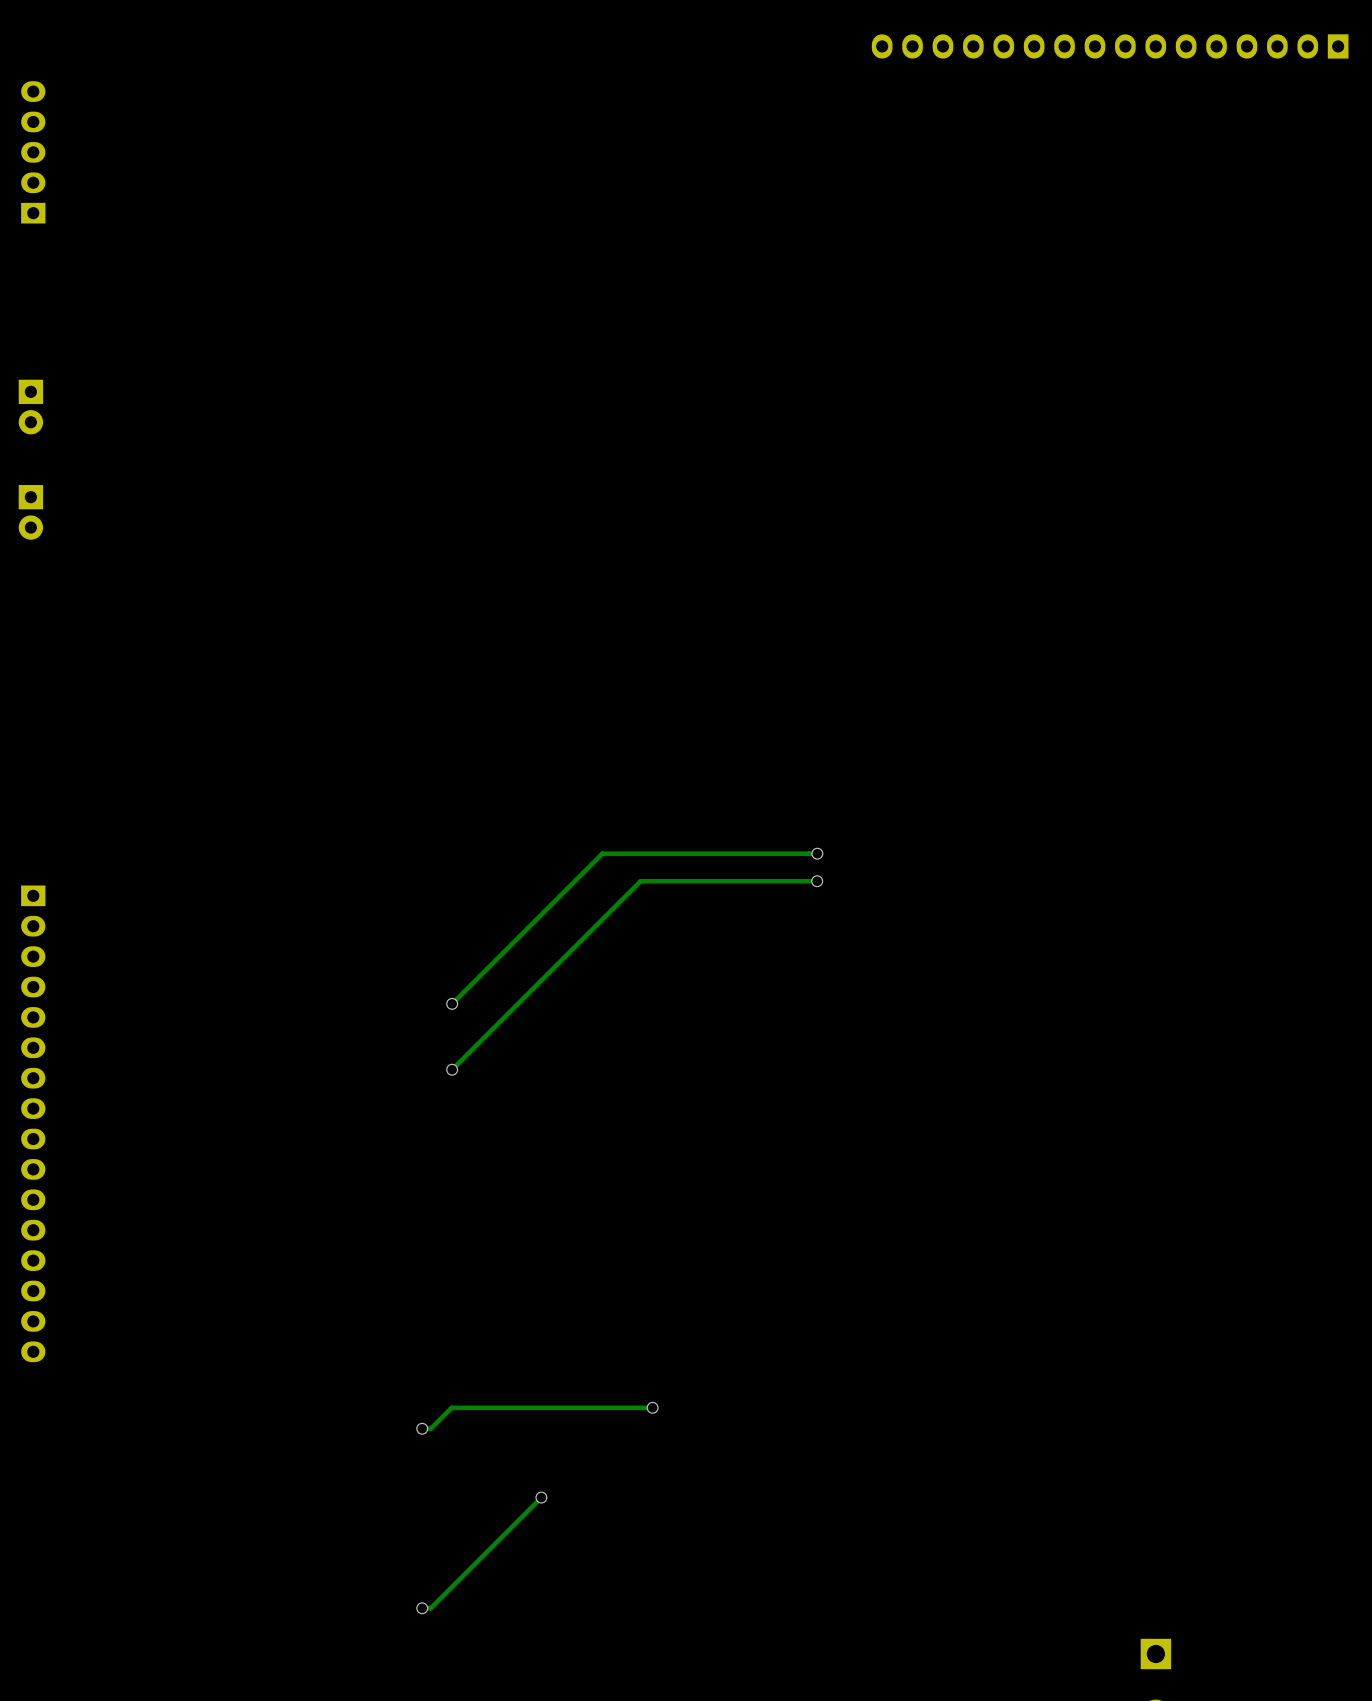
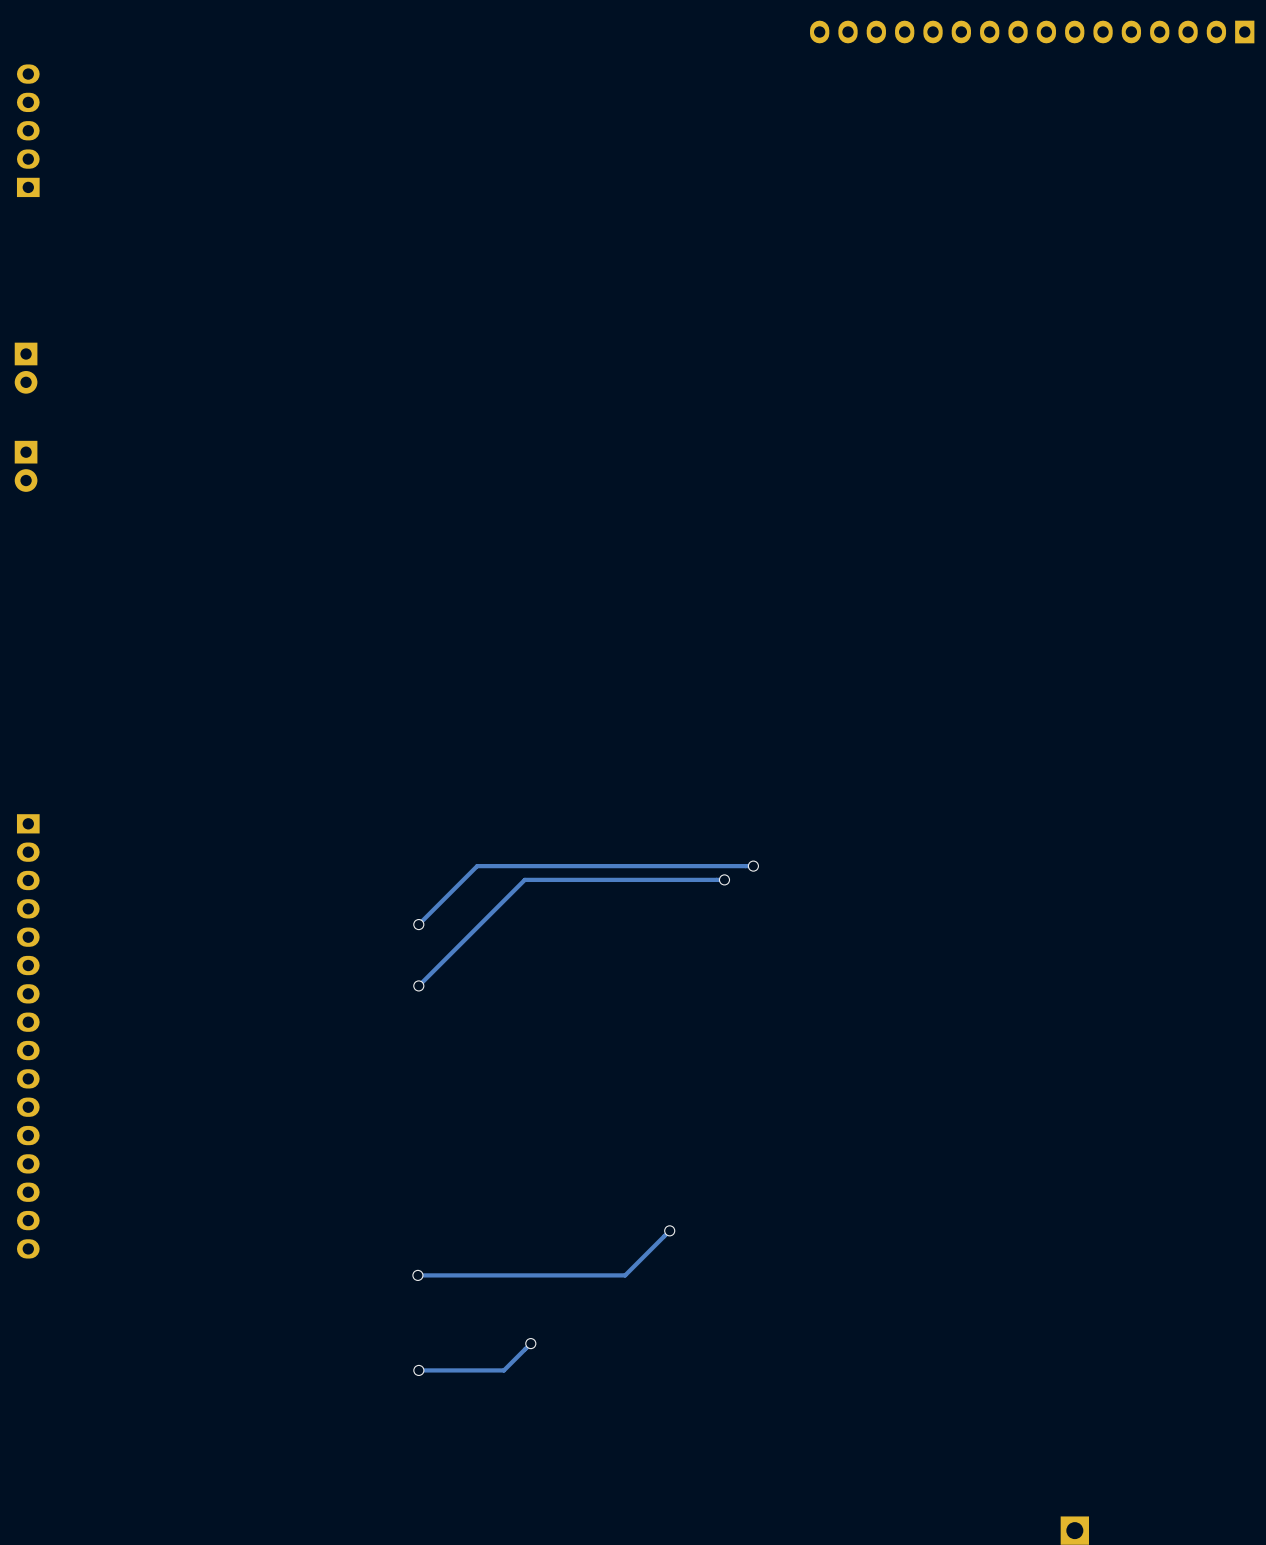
track: (817, 853) (602, 853) (514, 941) -> (753, 866) (477, 866)
via: (817, 853) -> none
track: (817, 881) (640, 881) (565, 955) -> (724, 879) (524, 879)
via: (817, 881) -> none
via: none -> (753, 866)
via: none -> (724, 879)
track: none -> (669, 1230) (625, 1275) (417, 1275)
via: none -> (669, 1230)
via: none -> (417, 1275)
track: (652, 1407) (451, 1407) (430, 1428) (422, 1428) -> none
via: (652, 1407) -> none
via: (422, 1428) -> none
track: none -> (530, 1343) (503, 1370) (418, 1370)
via: none -> (530, 1343)
via: none -> (418, 1370)
track: (541, 1497) (430, 1608) (422, 1608) -> none
via: (541, 1497) -> none
via: (422, 1608) -> none

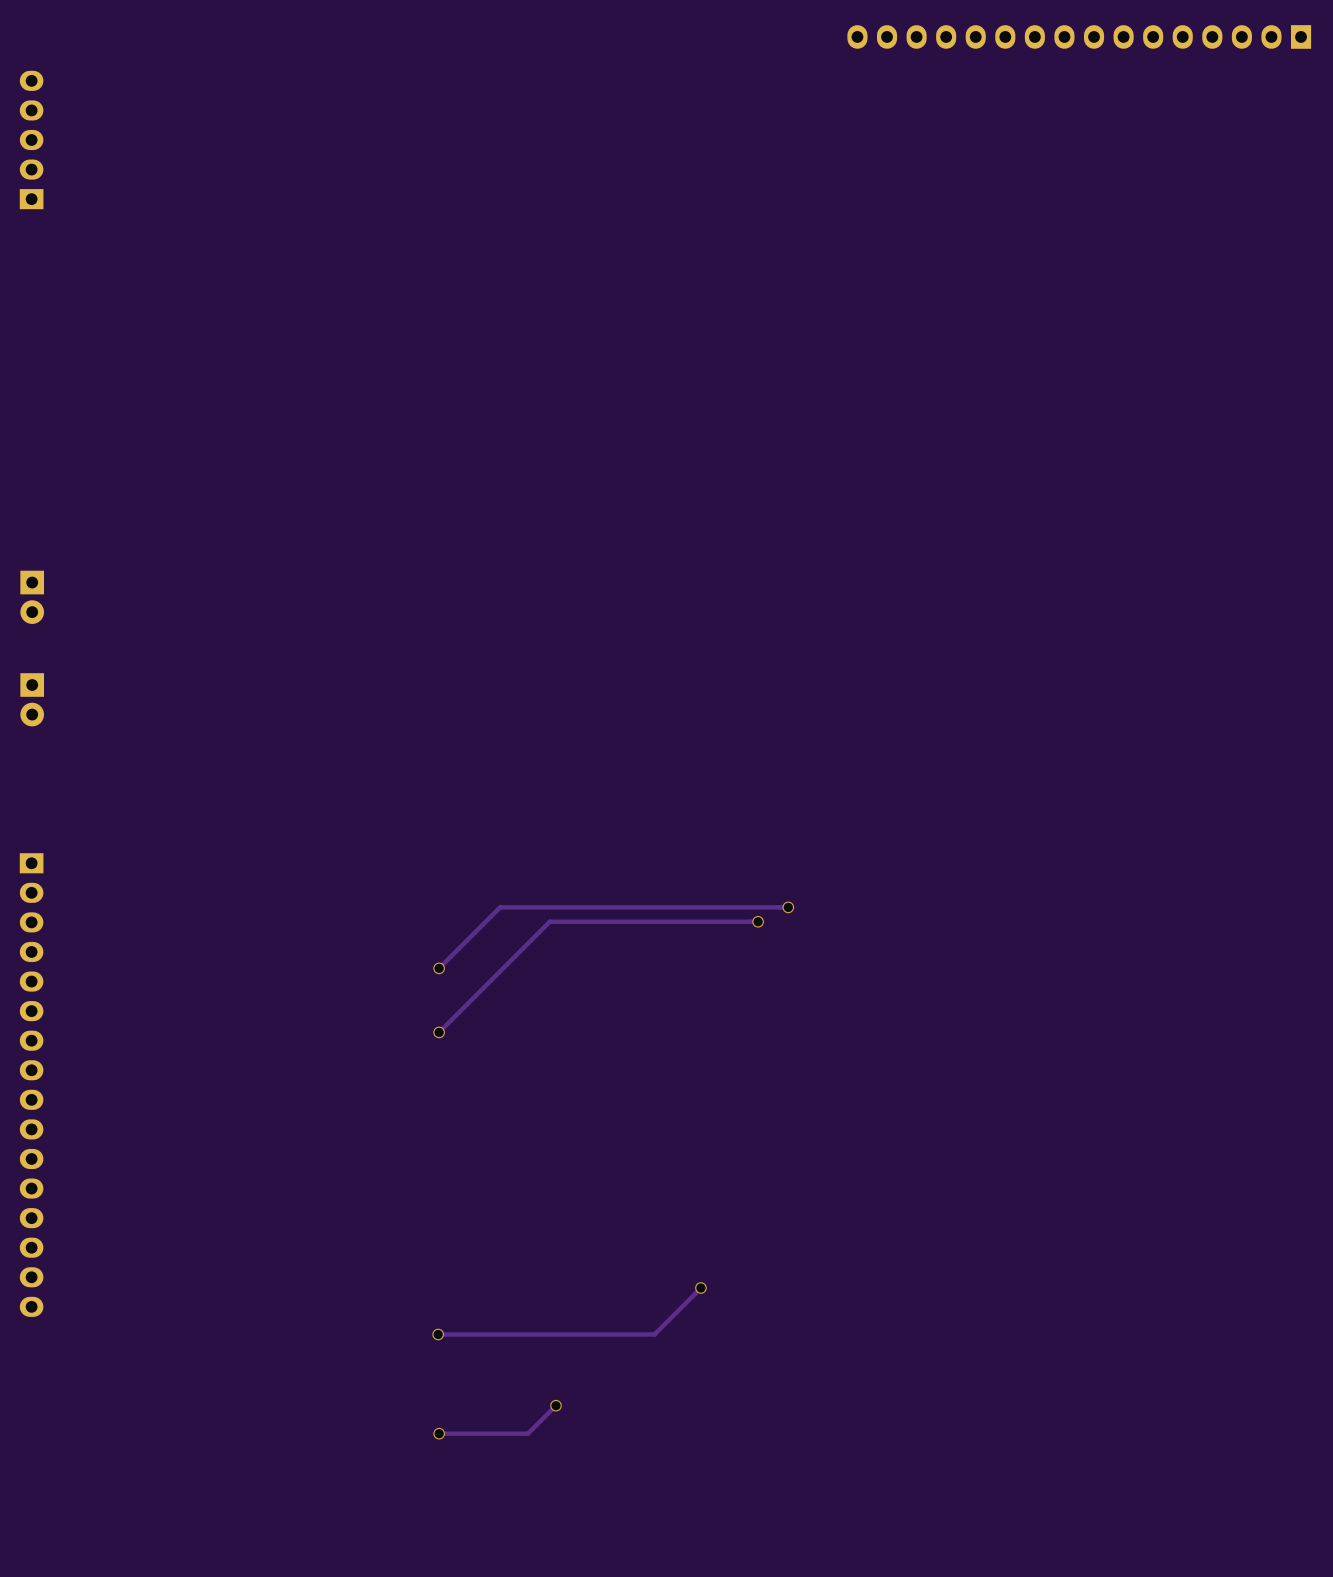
part: (26, 368) -> none
part: (26, 466) -> none
part: none -> (32, 597)
part: none -> (32, 699)

